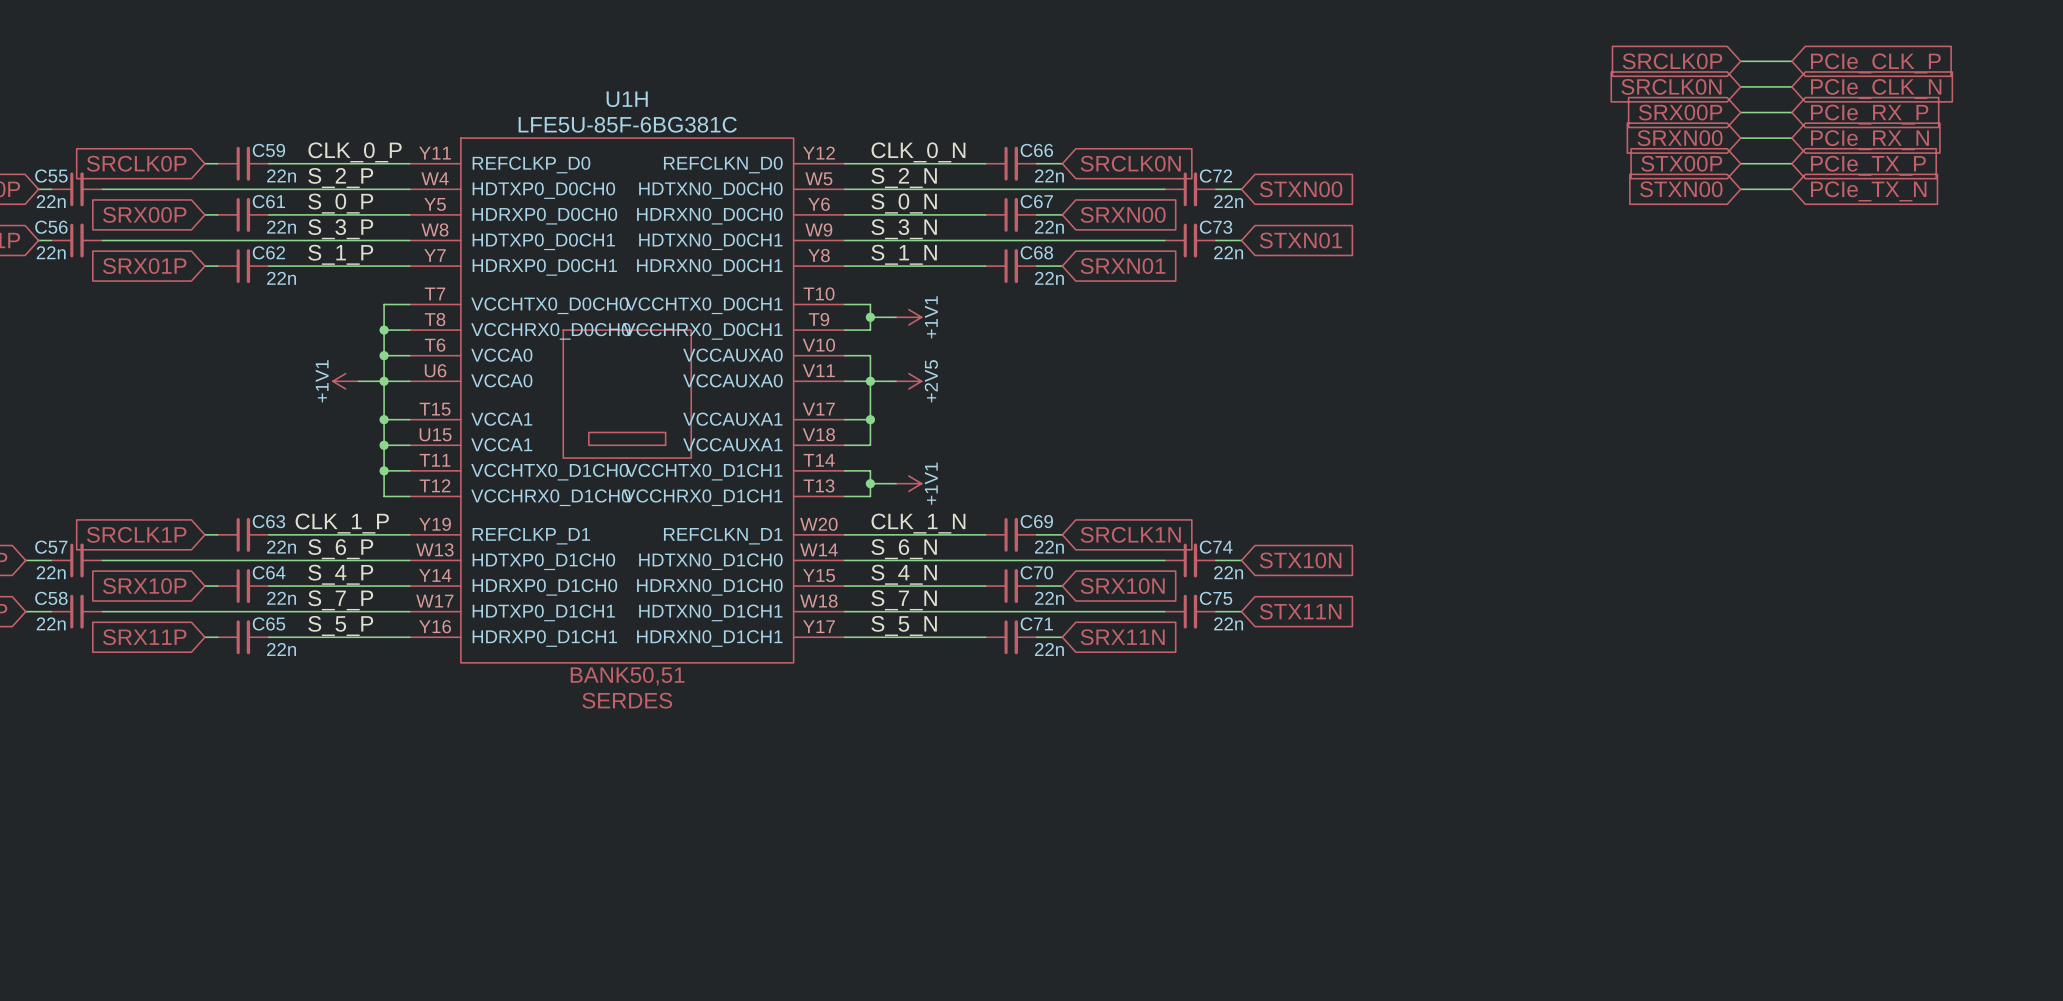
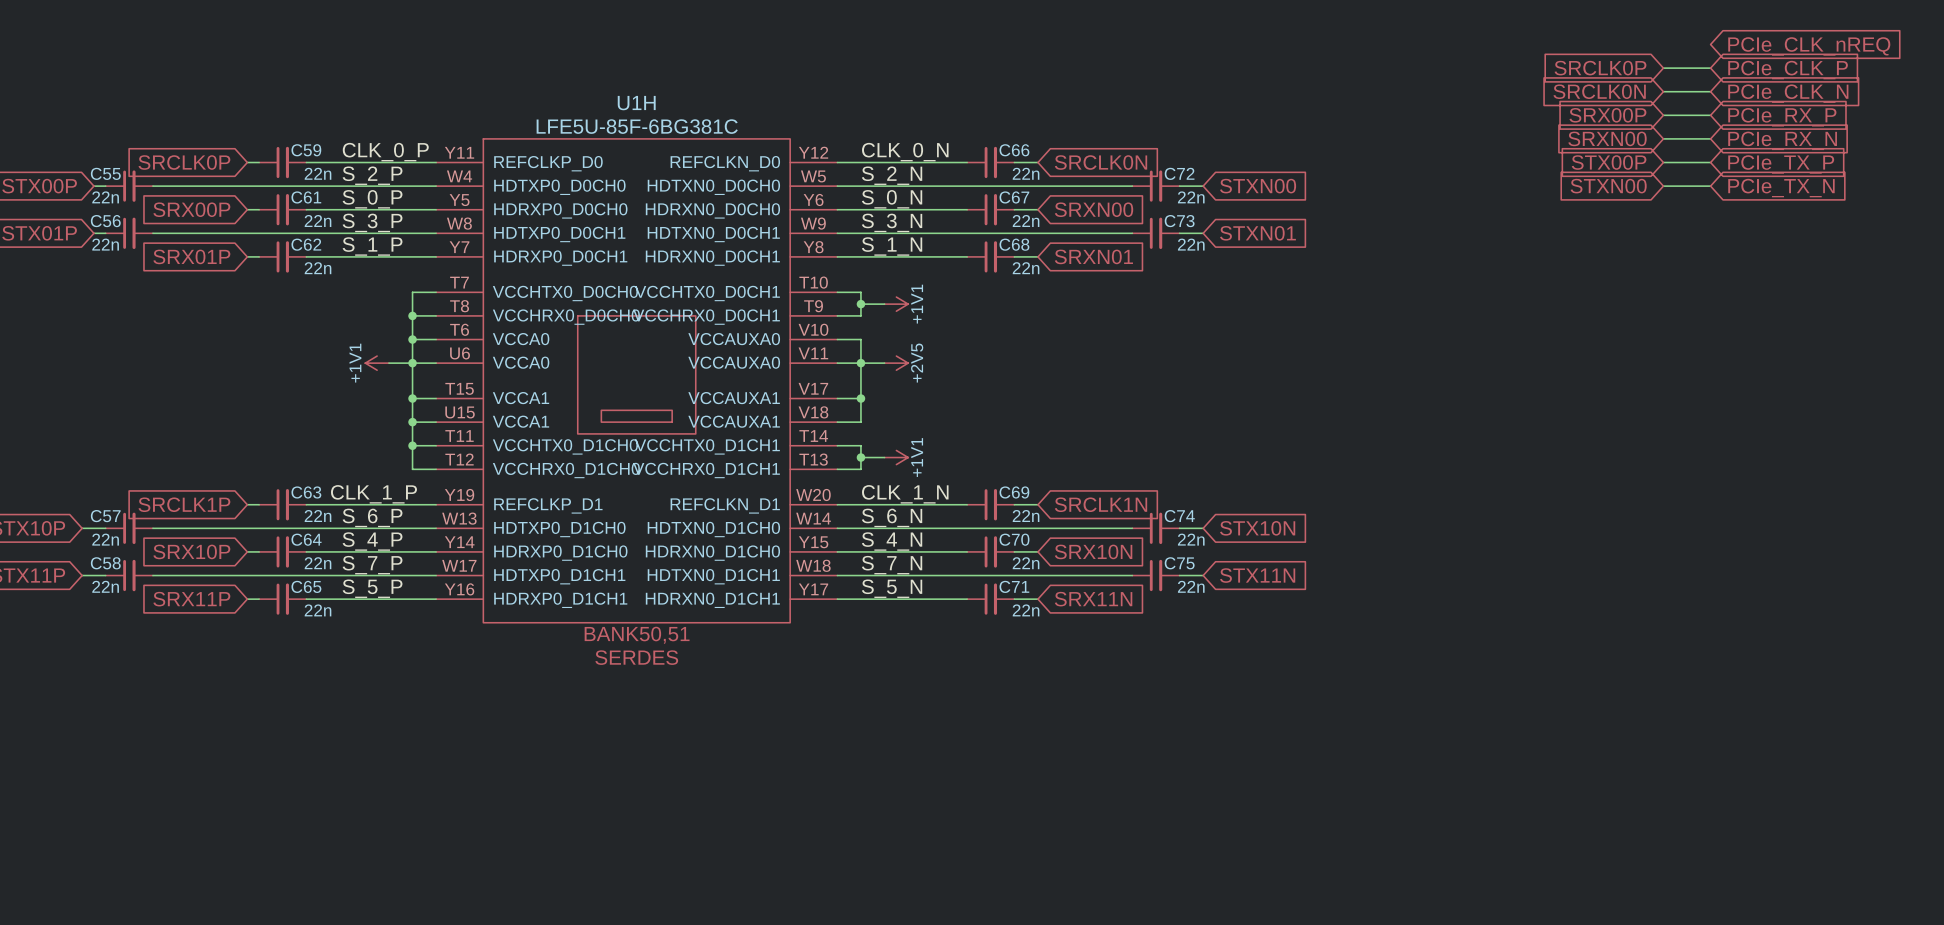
global label: none -> PCIe_CLK_nREQ (1809, 46)

